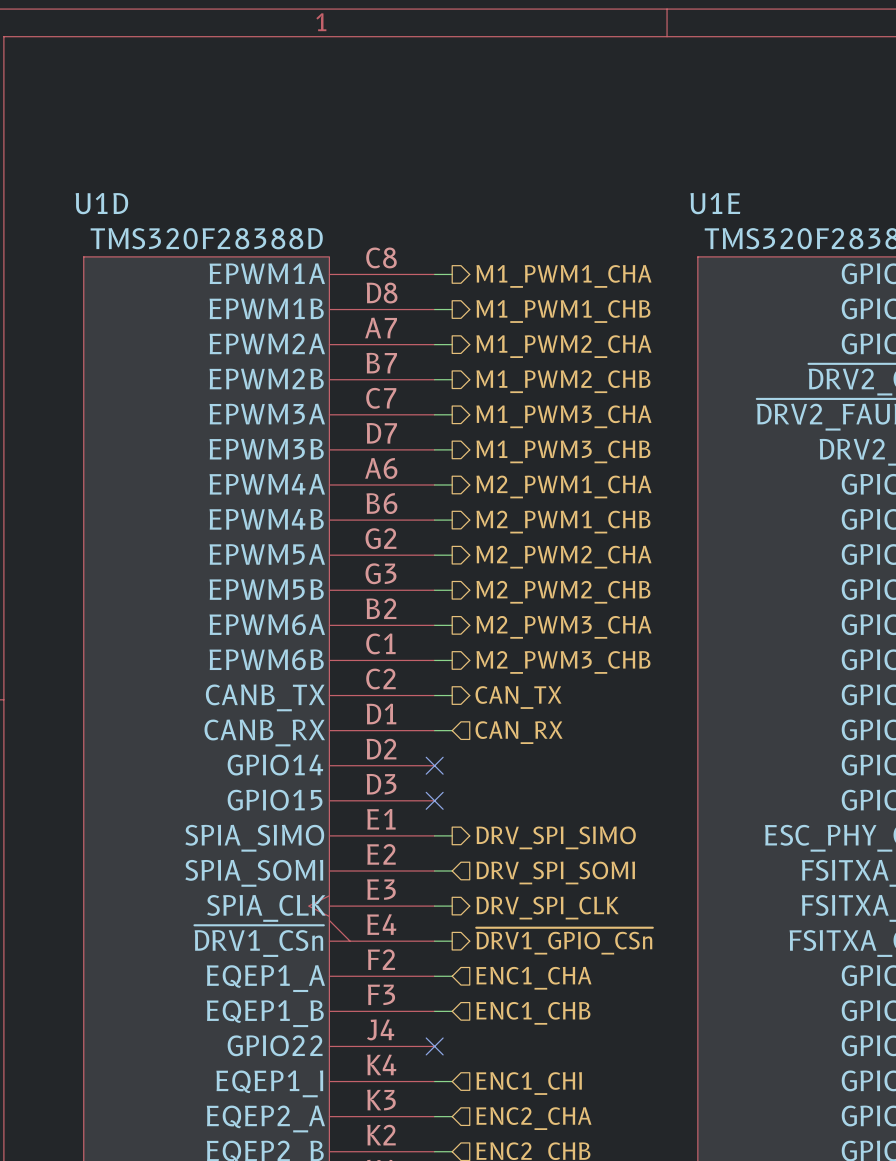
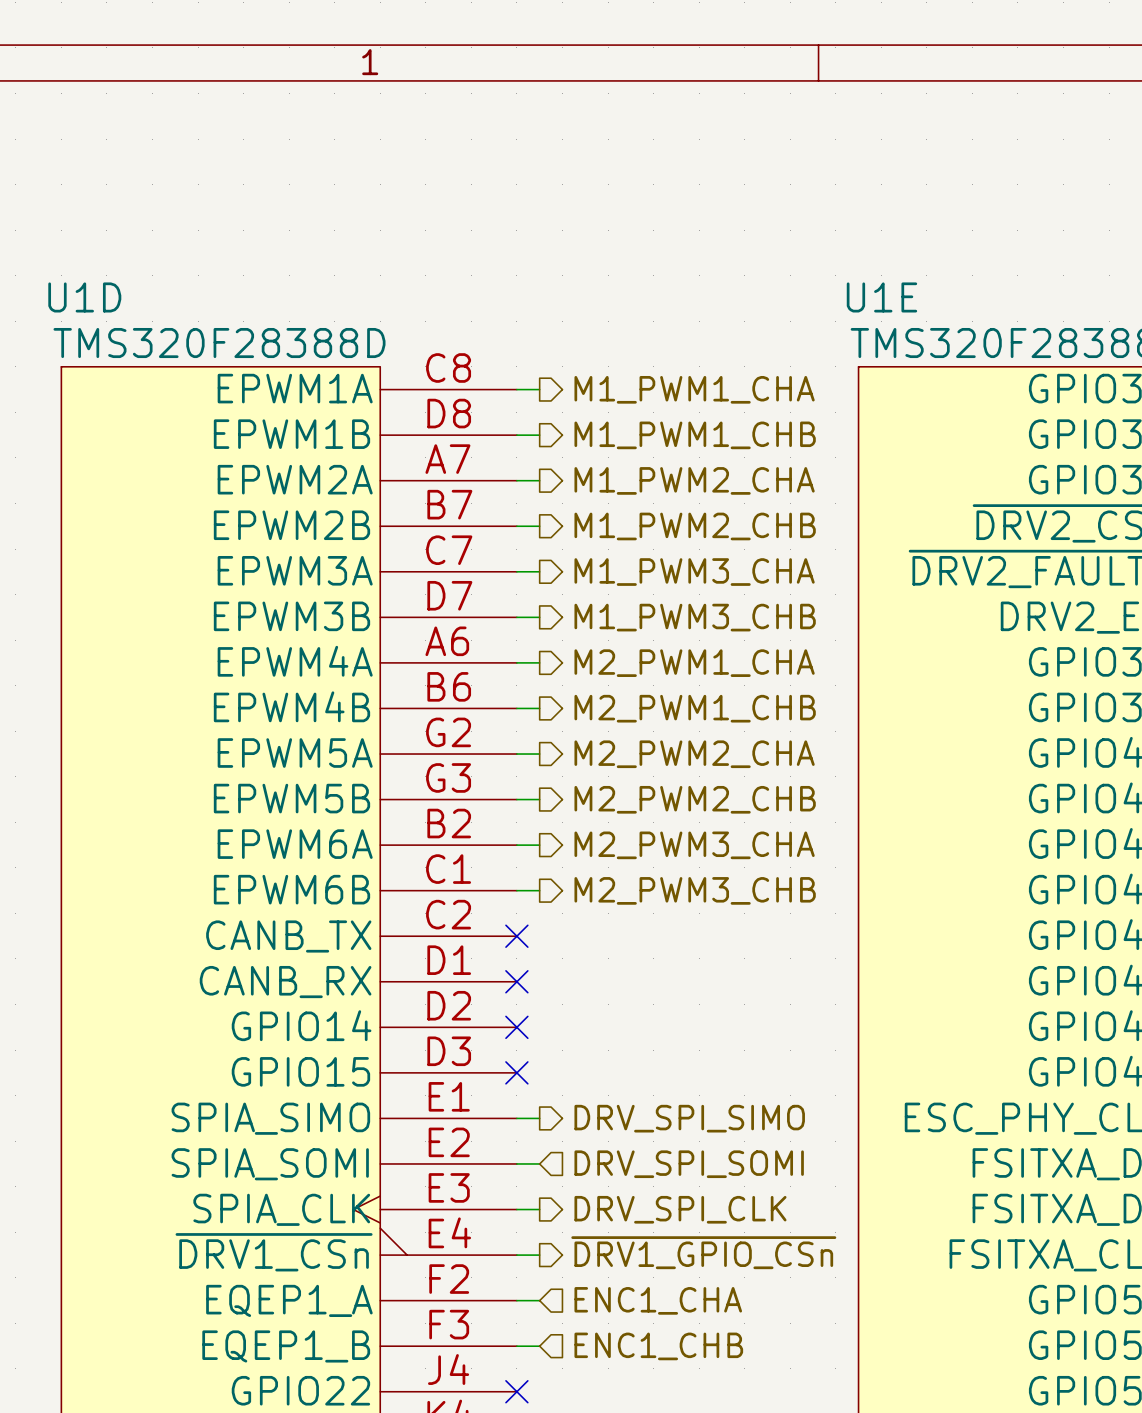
wire: (434, 695) (452, 695) -> none
no-connect mark: none -> (516, 936)
hierarchical label: CAN_TX (518, 697) -> none
wire: (434, 730) (452, 730) -> none
no-connect mark: none -> (516, 981)
hierarchical label: CAN_RX (519, 732) -> none

